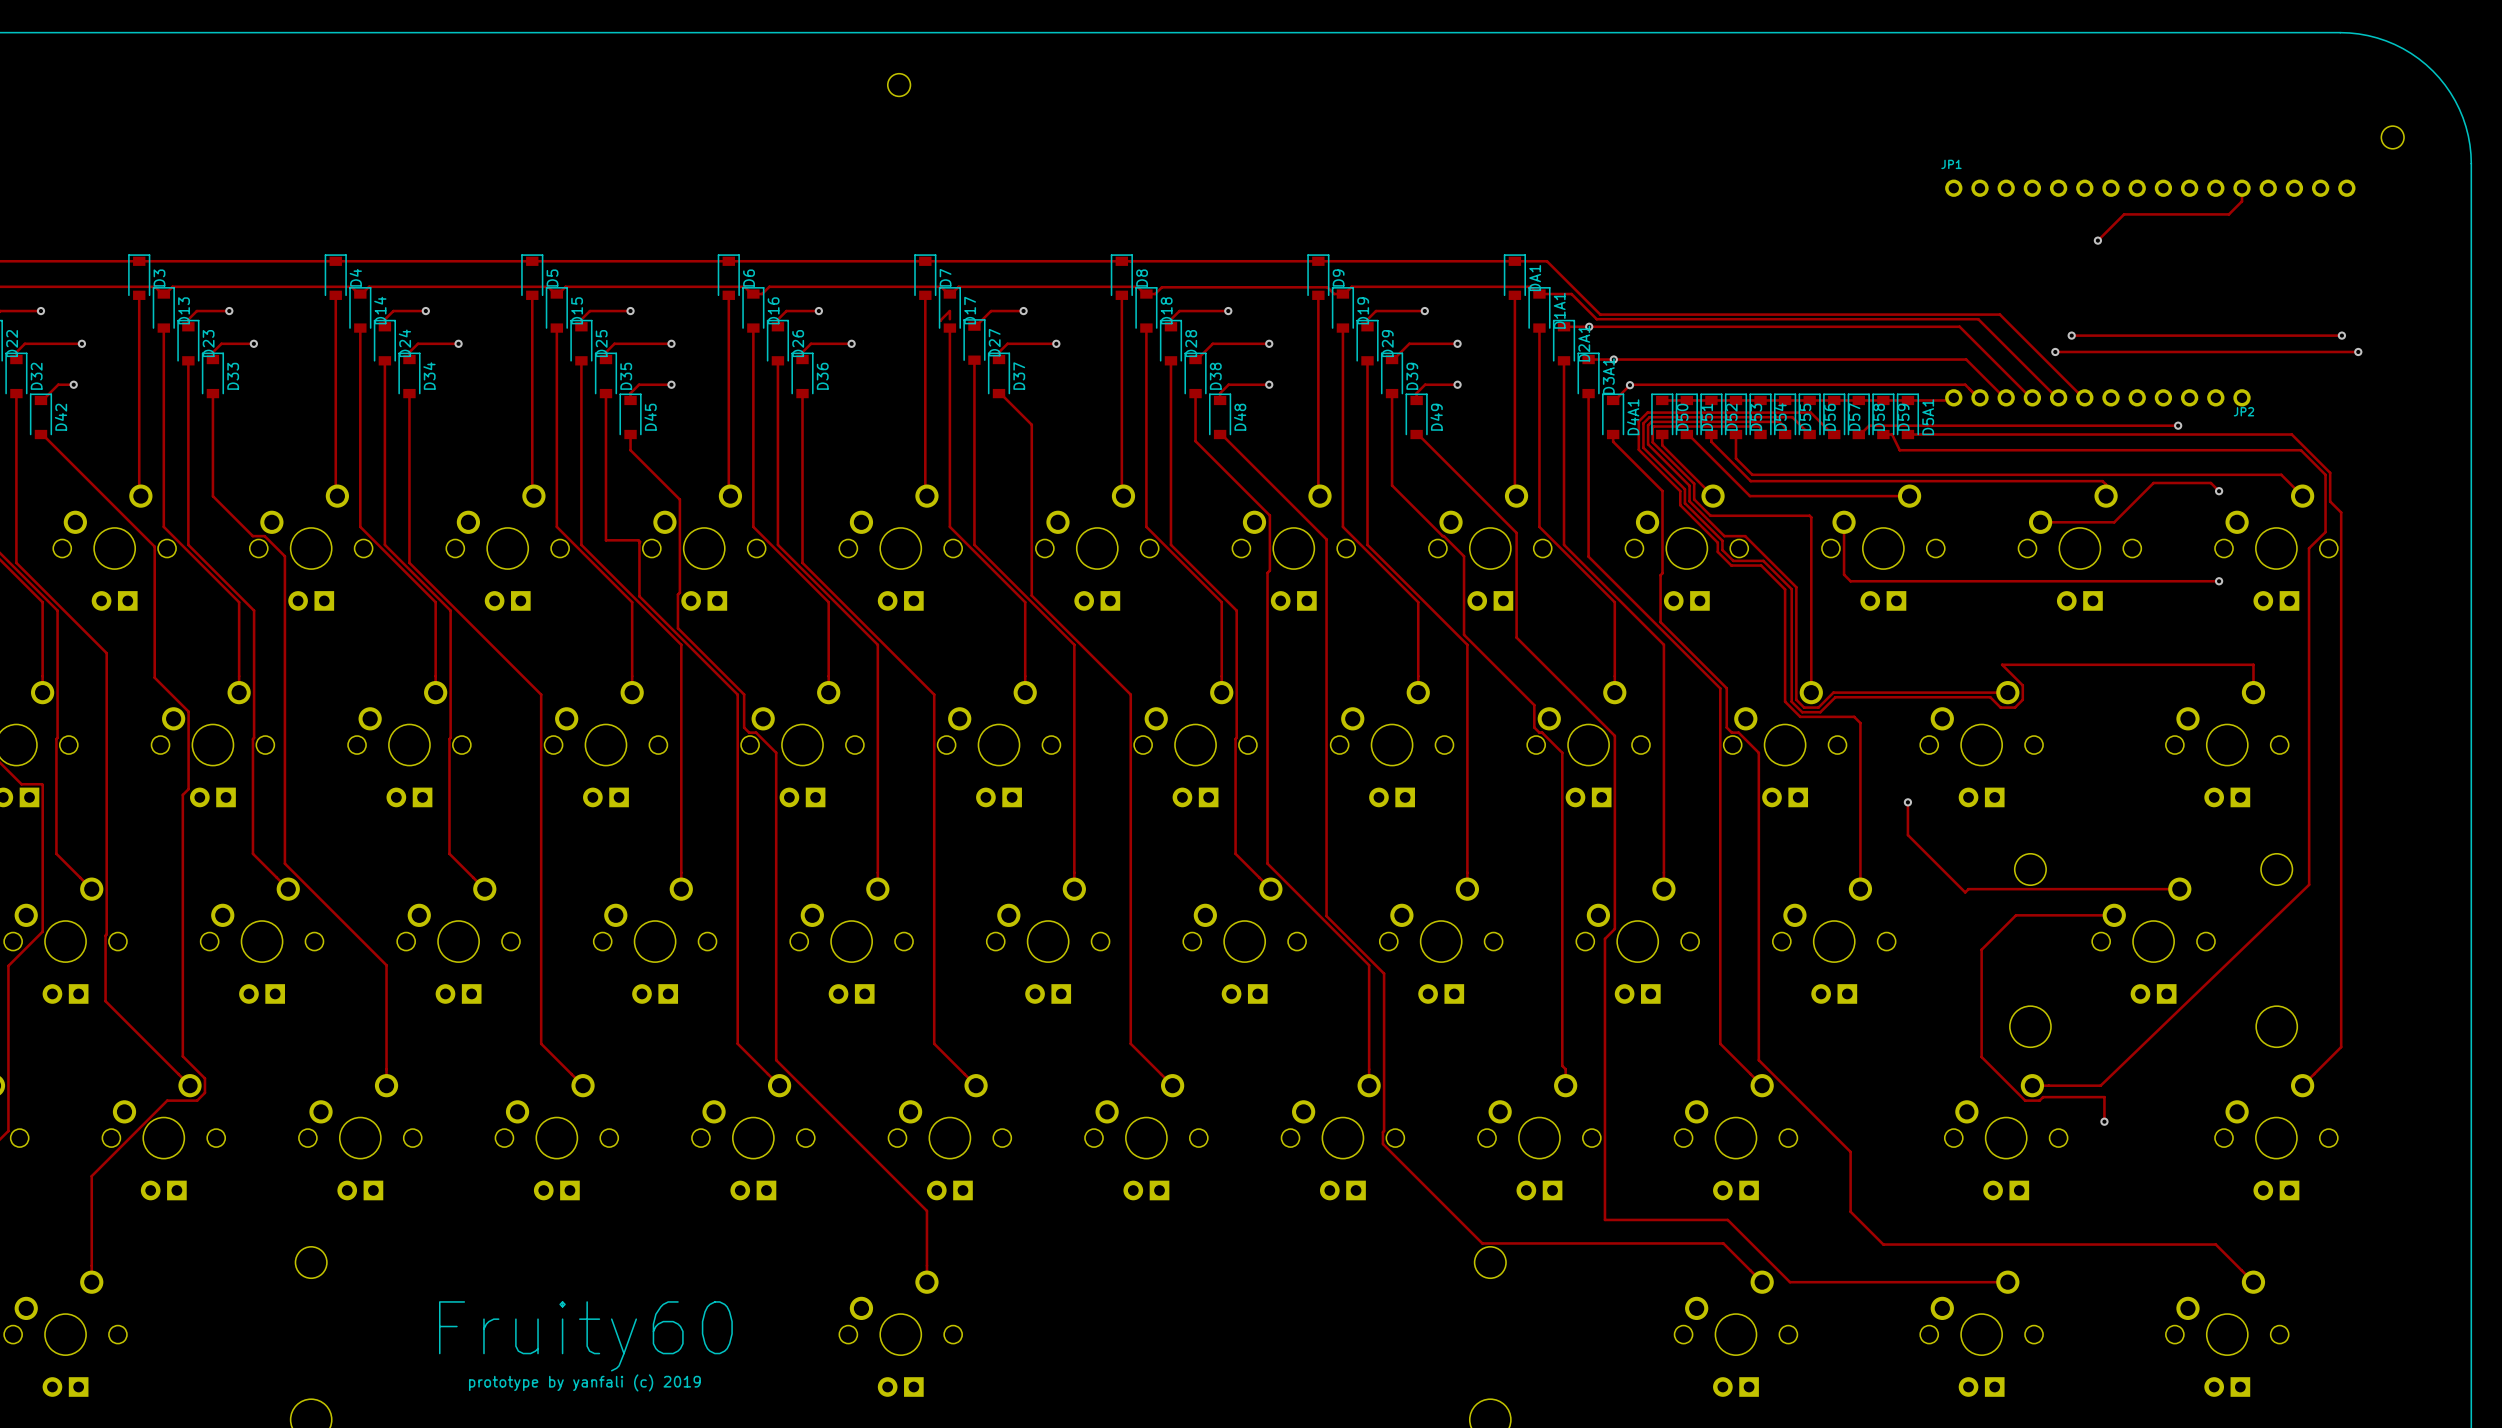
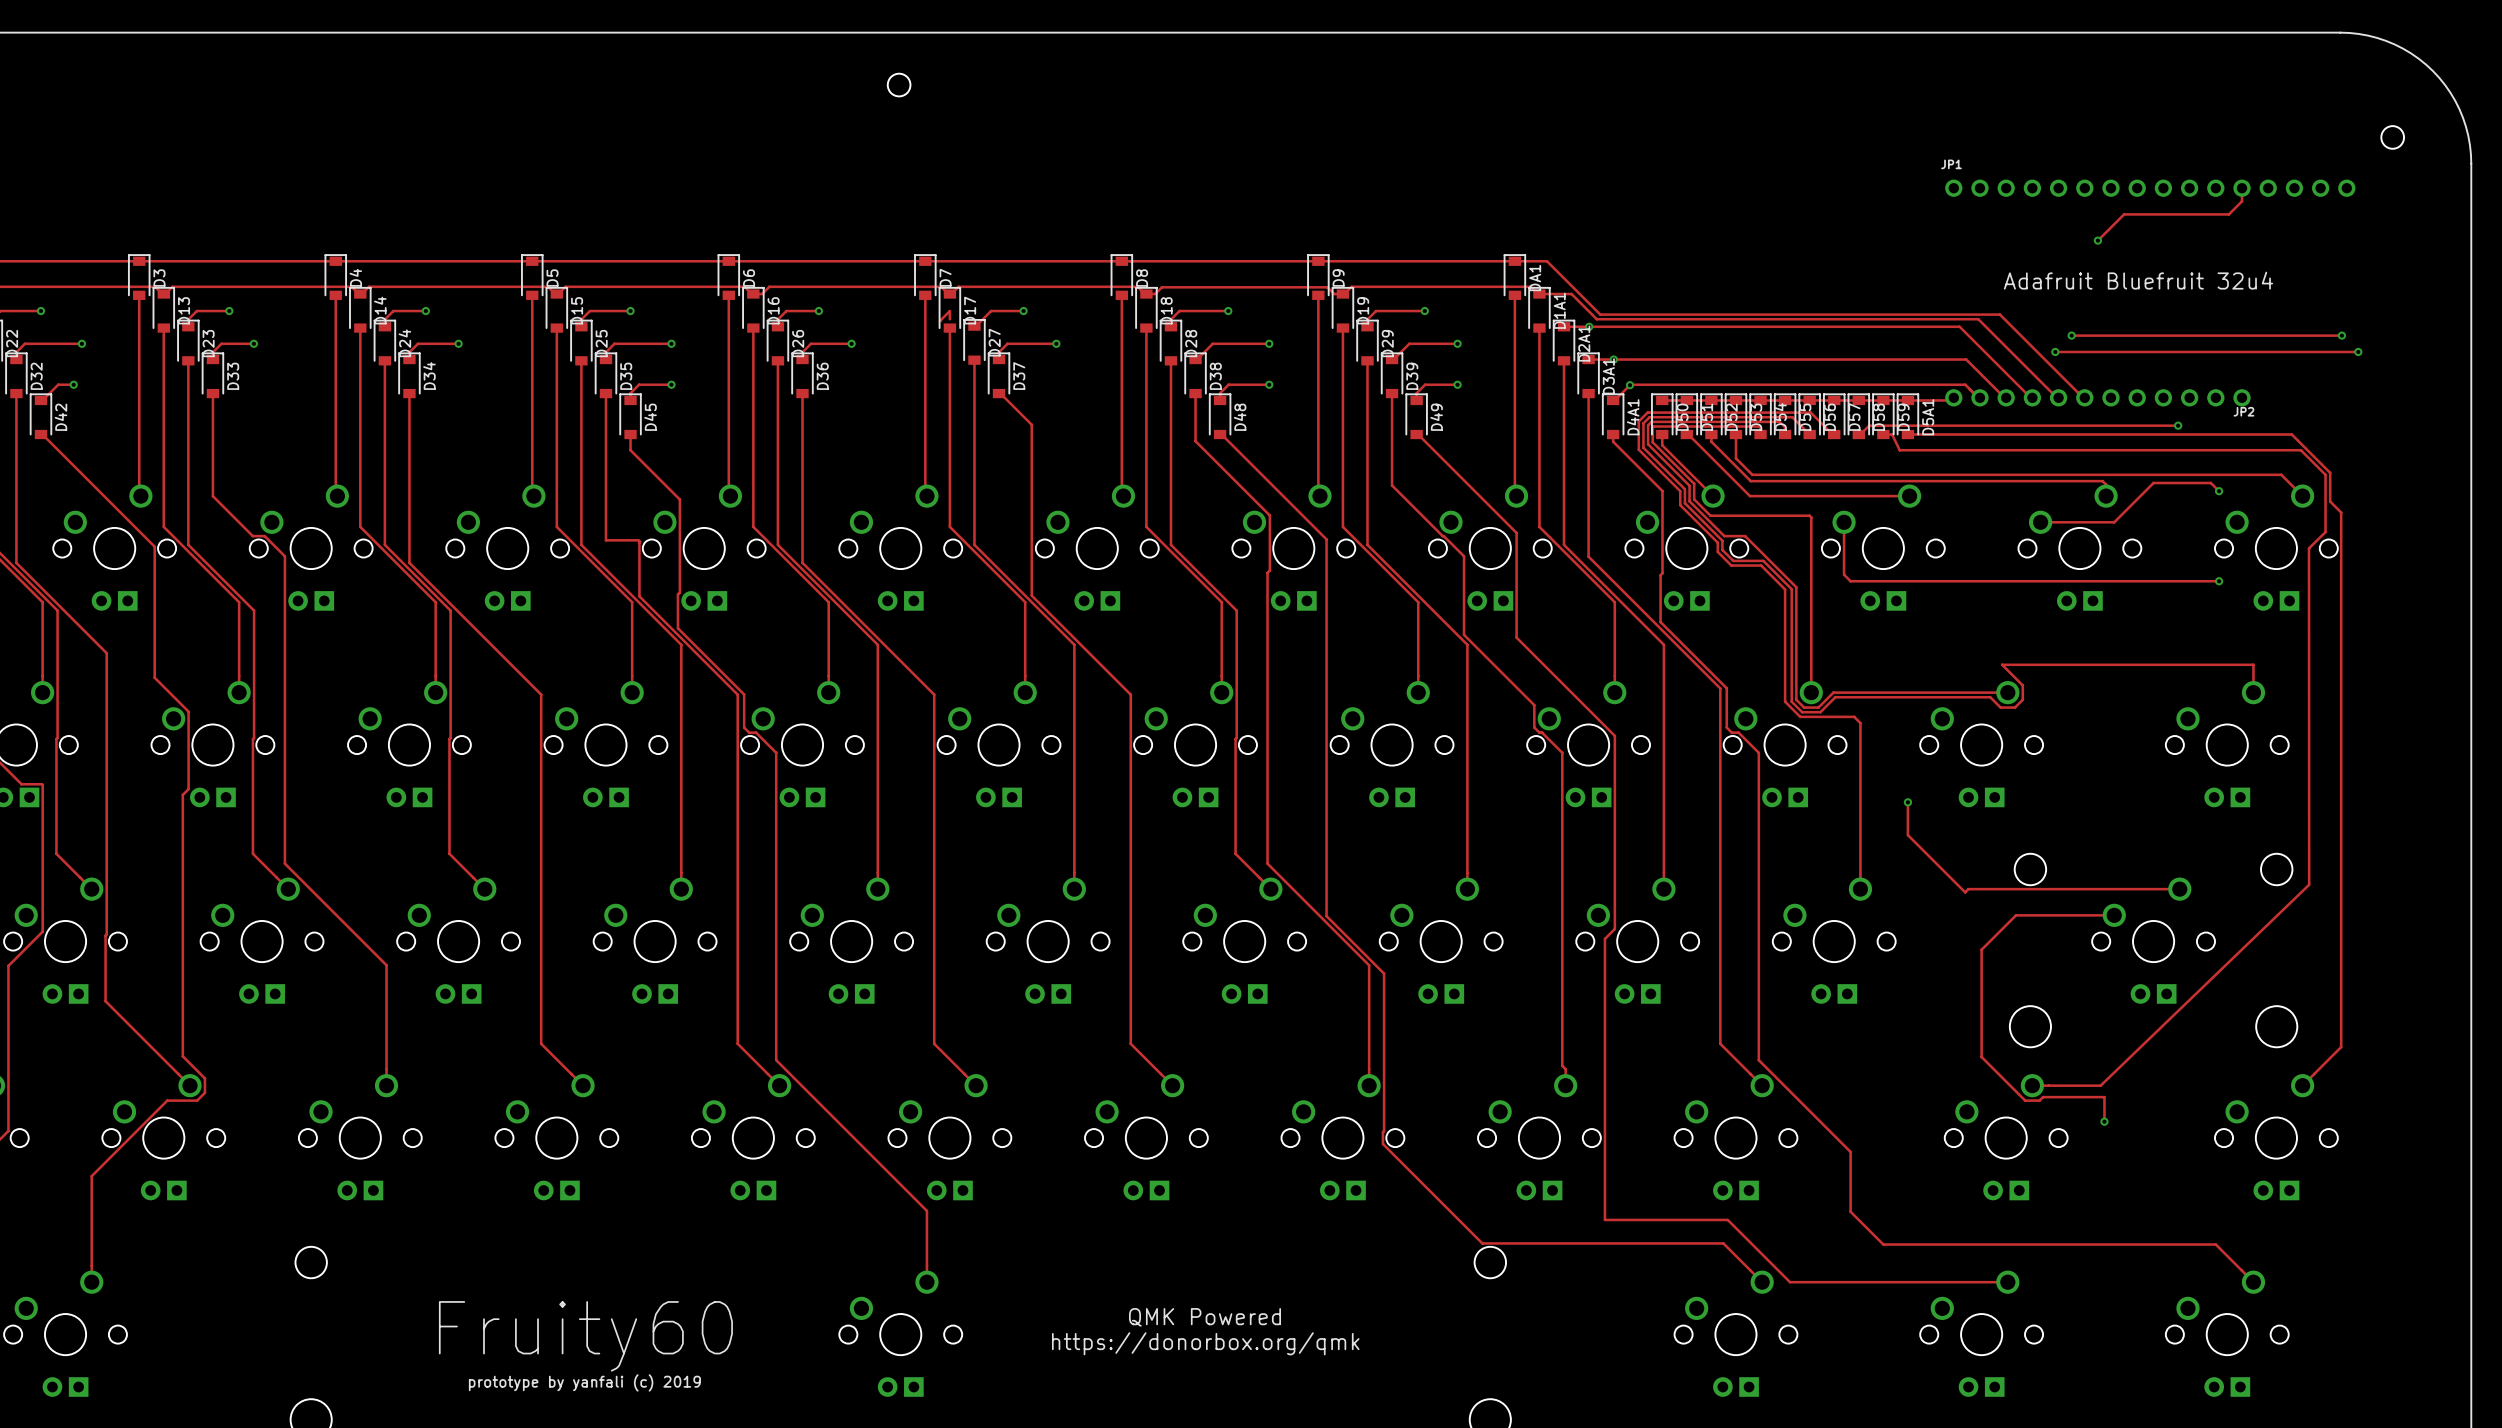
text: none -> Adafruit Bluefruit 32u4 (2138, 280)
text: none -> QMK Powered (1204, 1317)
text: none -> https://donorbox.org/qmk (1205, 1343)

